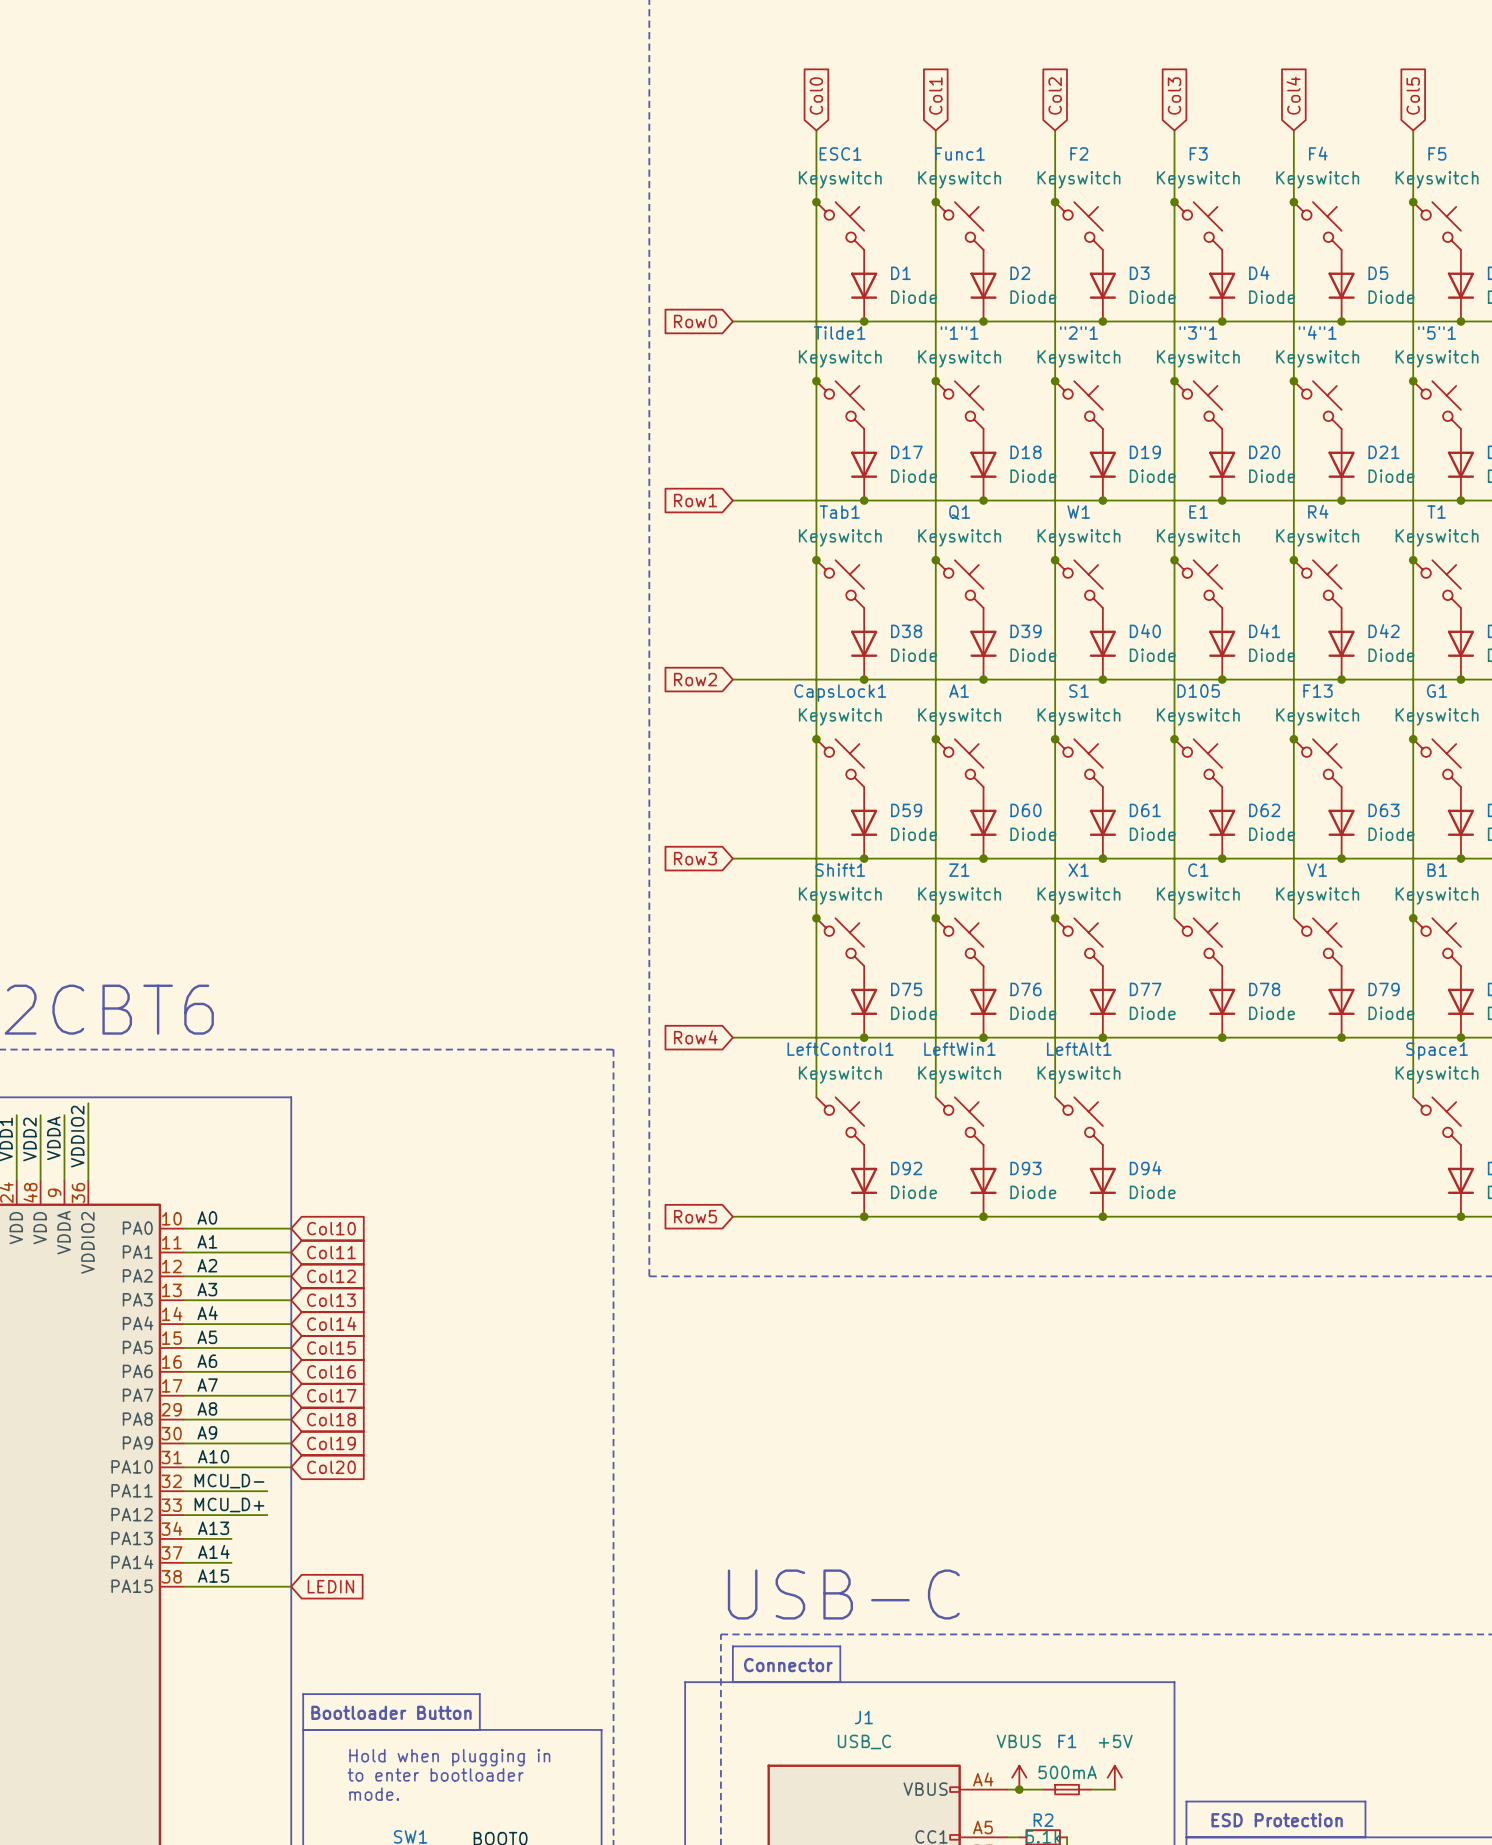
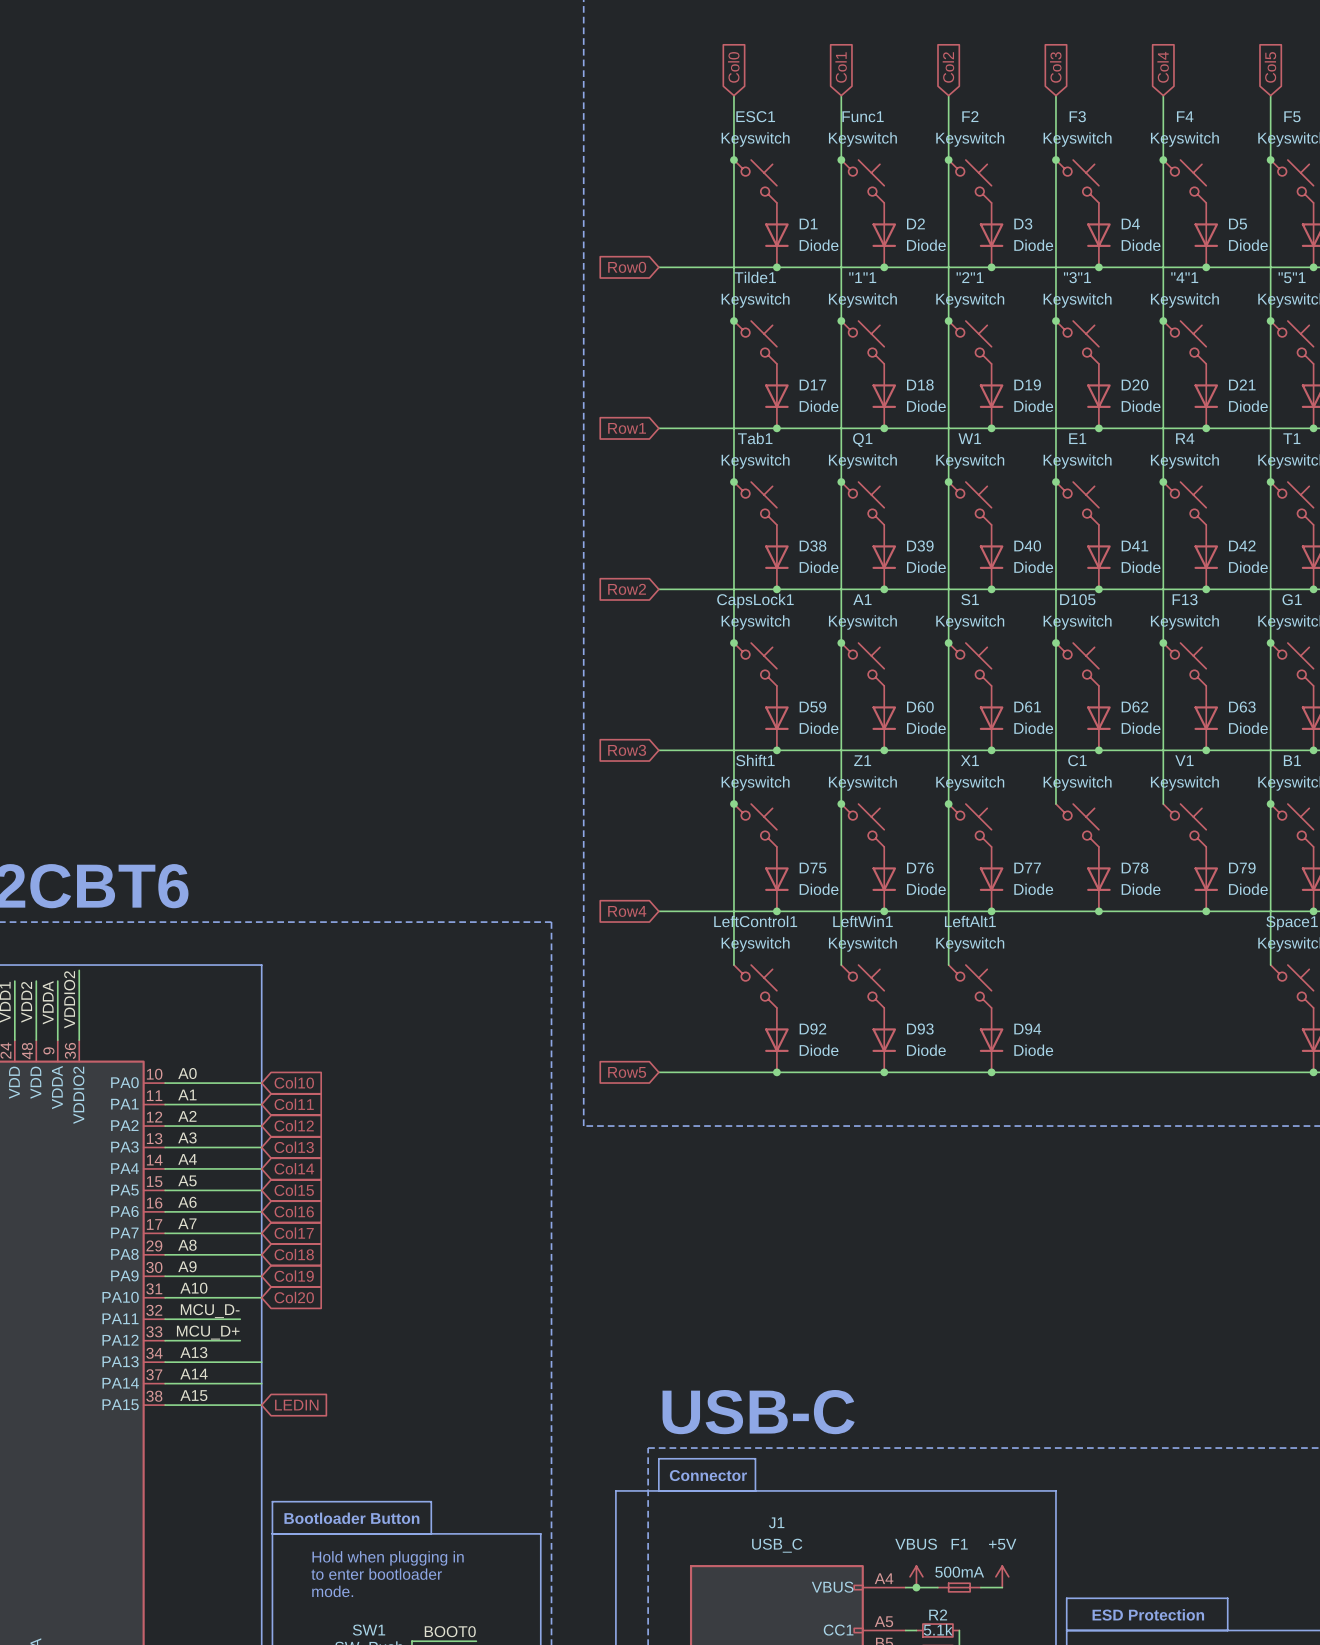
wire: none -> (208, 1362) (261, 1362)
wire: none -> (208, 1383) (261, 1383)

